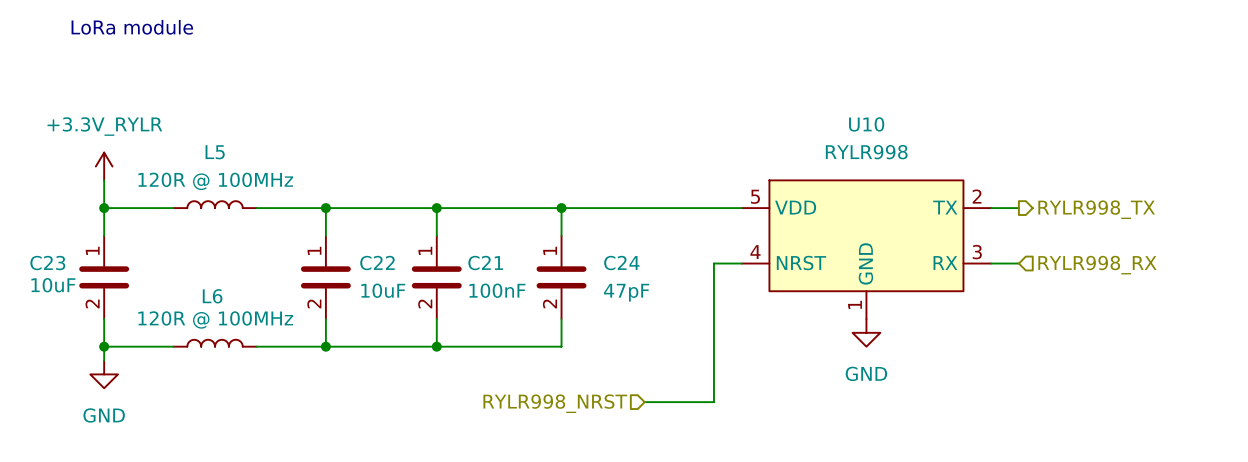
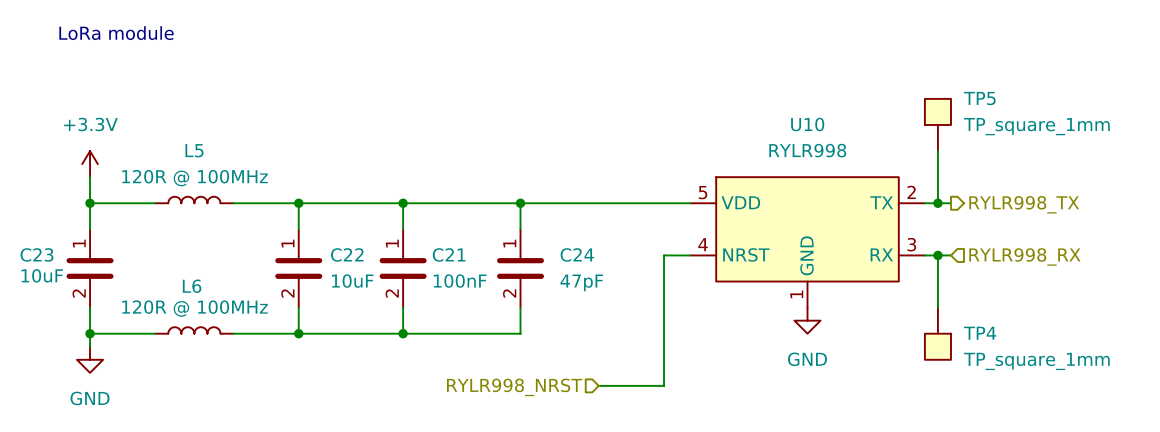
TP5: none -> TP_square_1mm (937, 124)
wire: none -> (937, 151) (937, 203)
power symbol: +3.3V_RYLR (104, 166) -> +3.3V (90, 164)
junction: none -> (937, 203)
wire: none -> (937, 255) (937, 307)
junction: none -> (937, 255)
TP4: none -> TP_square_1mm (937, 333)

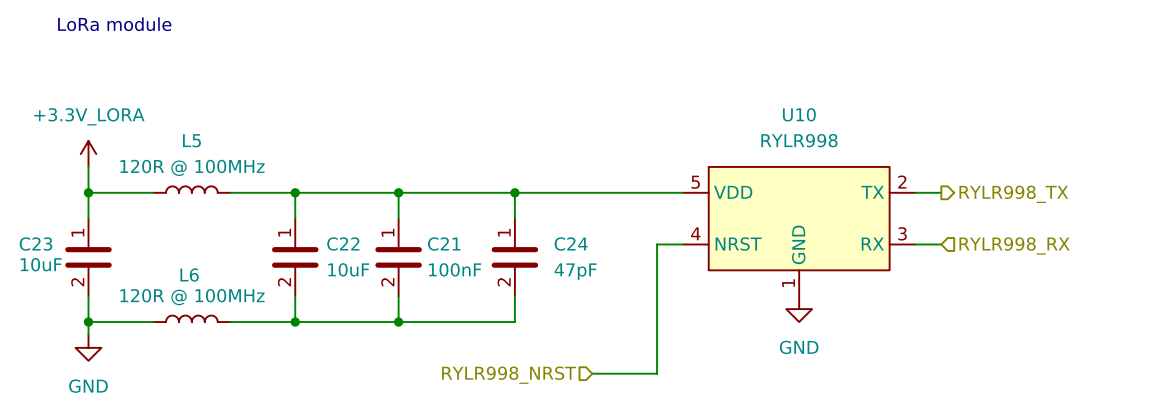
TP5: TP_square_1mm (937, 124) -> none
wire: (937, 151) (937, 203) -> none
power symbol: +3.3V (90, 164) -> +3.3V_LORA (88, 154)
junction: (937, 203) -> none
wire: (937, 255) (937, 307) -> none
junction: (937, 255) -> none
TP4: TP_square_1mm (937, 333) -> none

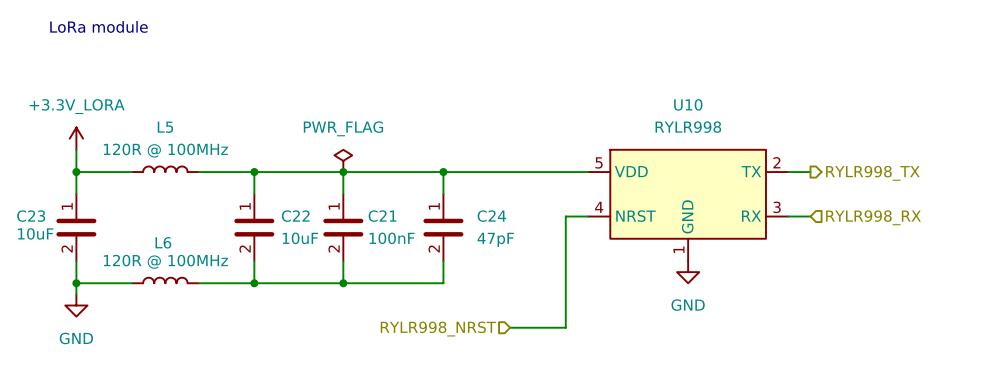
power symbol: none -> PWR_FLAG (343, 160)

